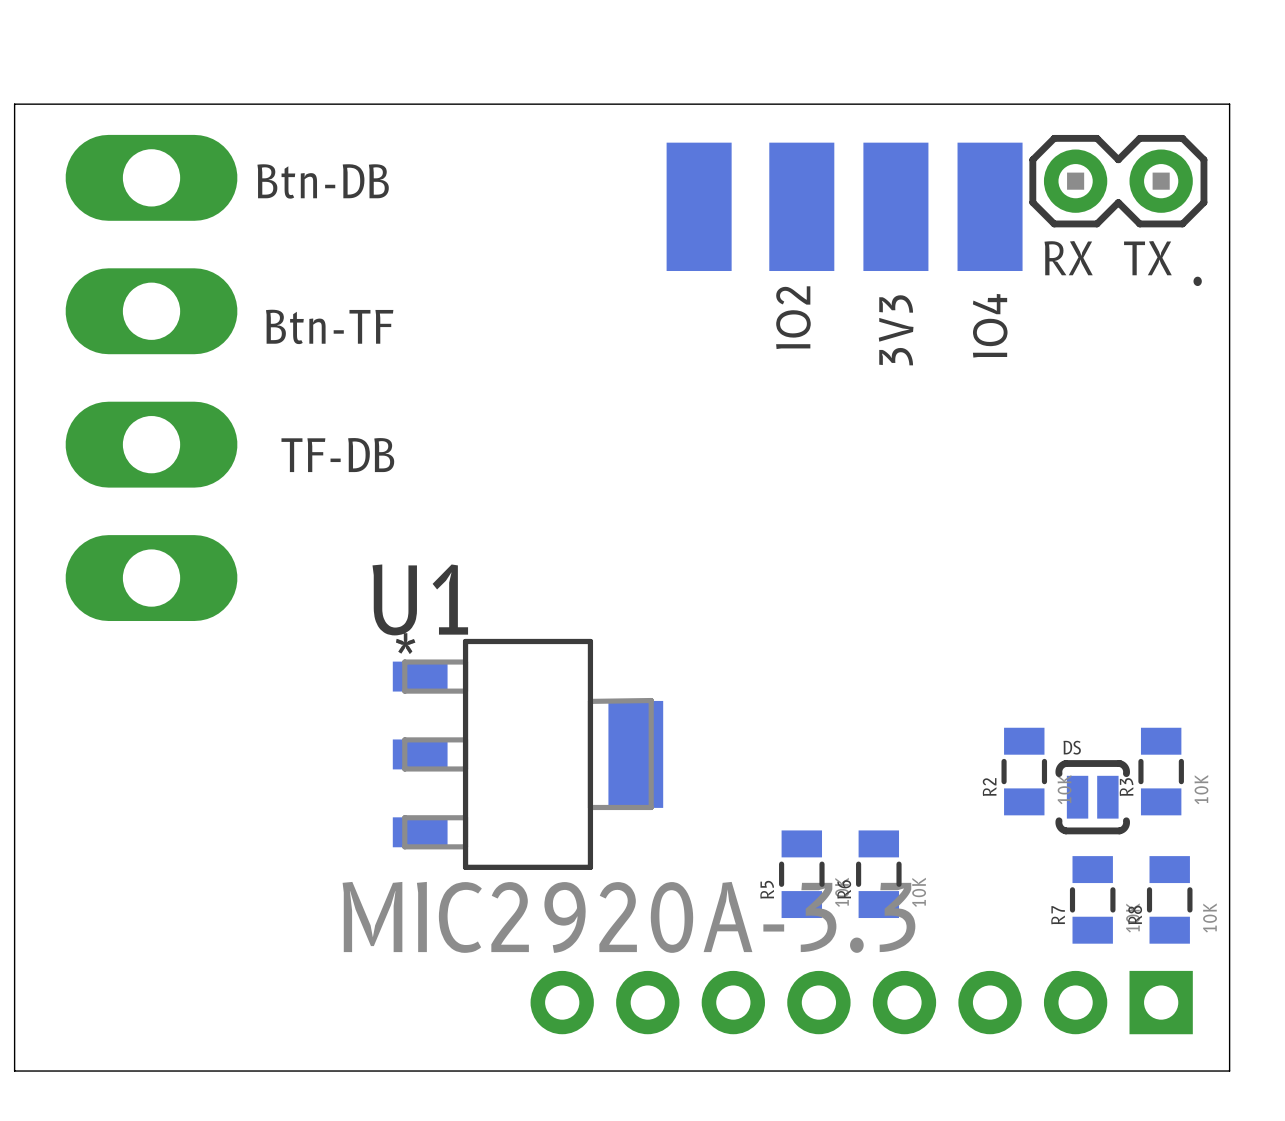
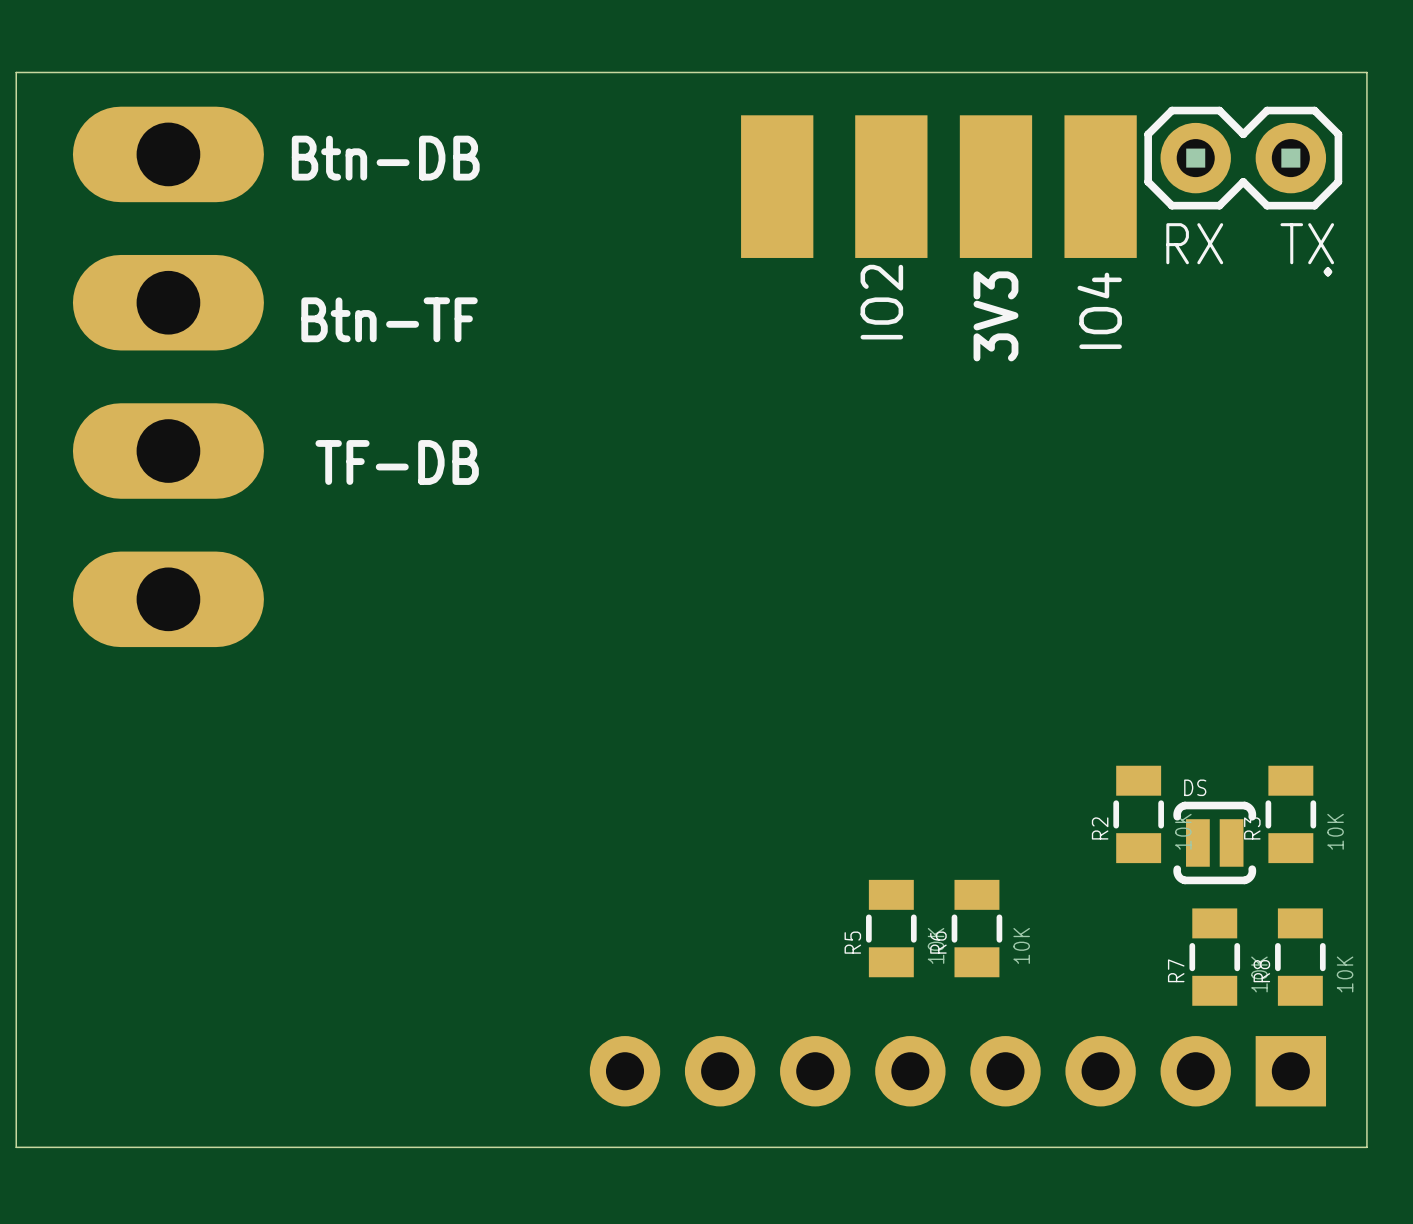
U1: MIC2920A-3.3 (527, 754) -> none

